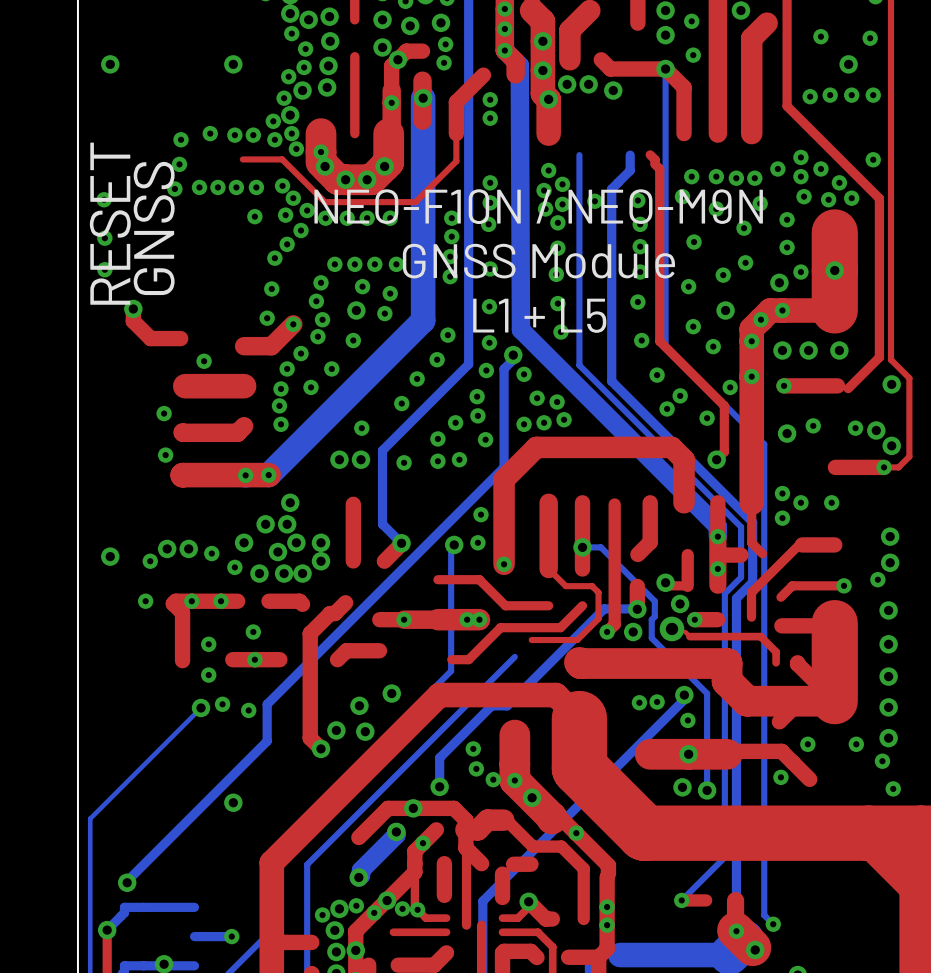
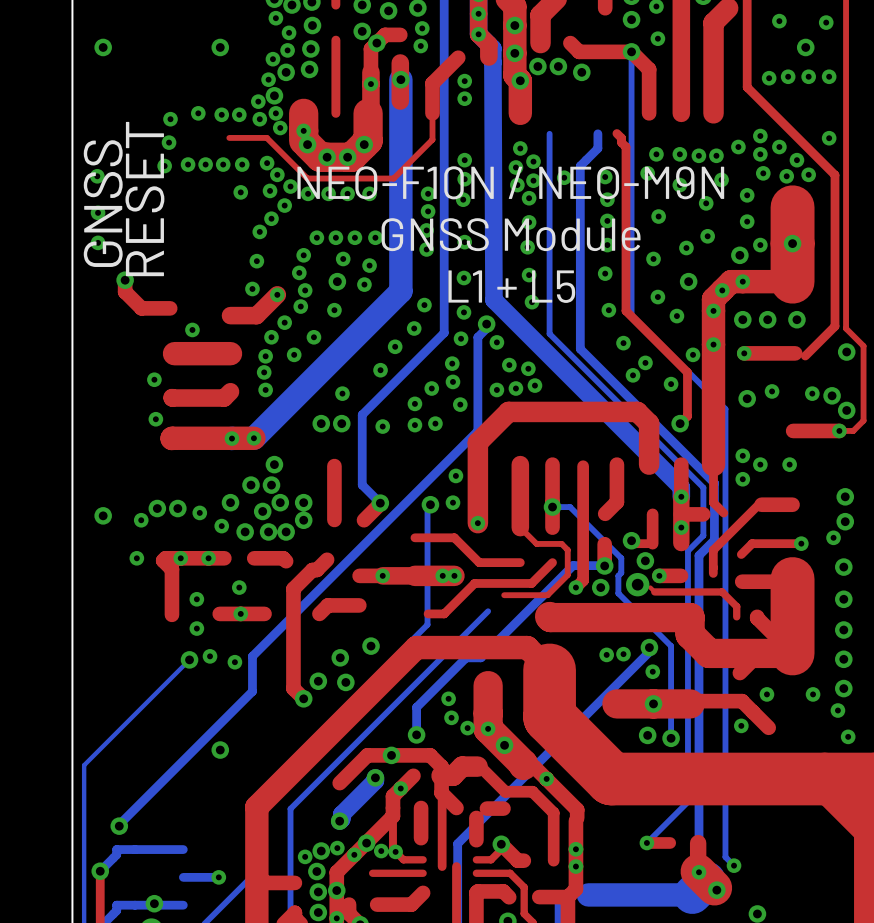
text position: RESET (110, 223) -> RESET (144, 199)
text position: GNSS (154, 228) -> GNSS (103, 203)

